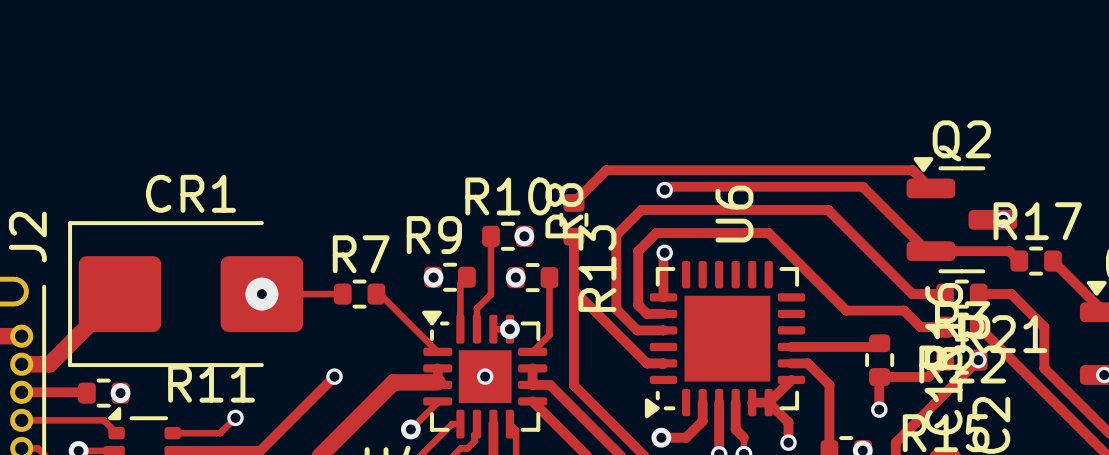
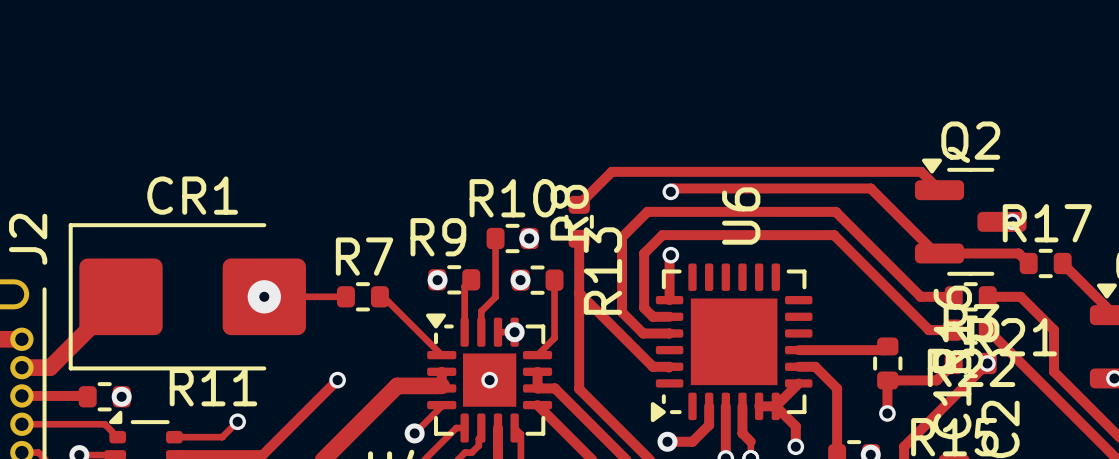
track: (768, 232) (846, 310) (904, 310) -> (775, 235) (834, 235) (912, 313)

